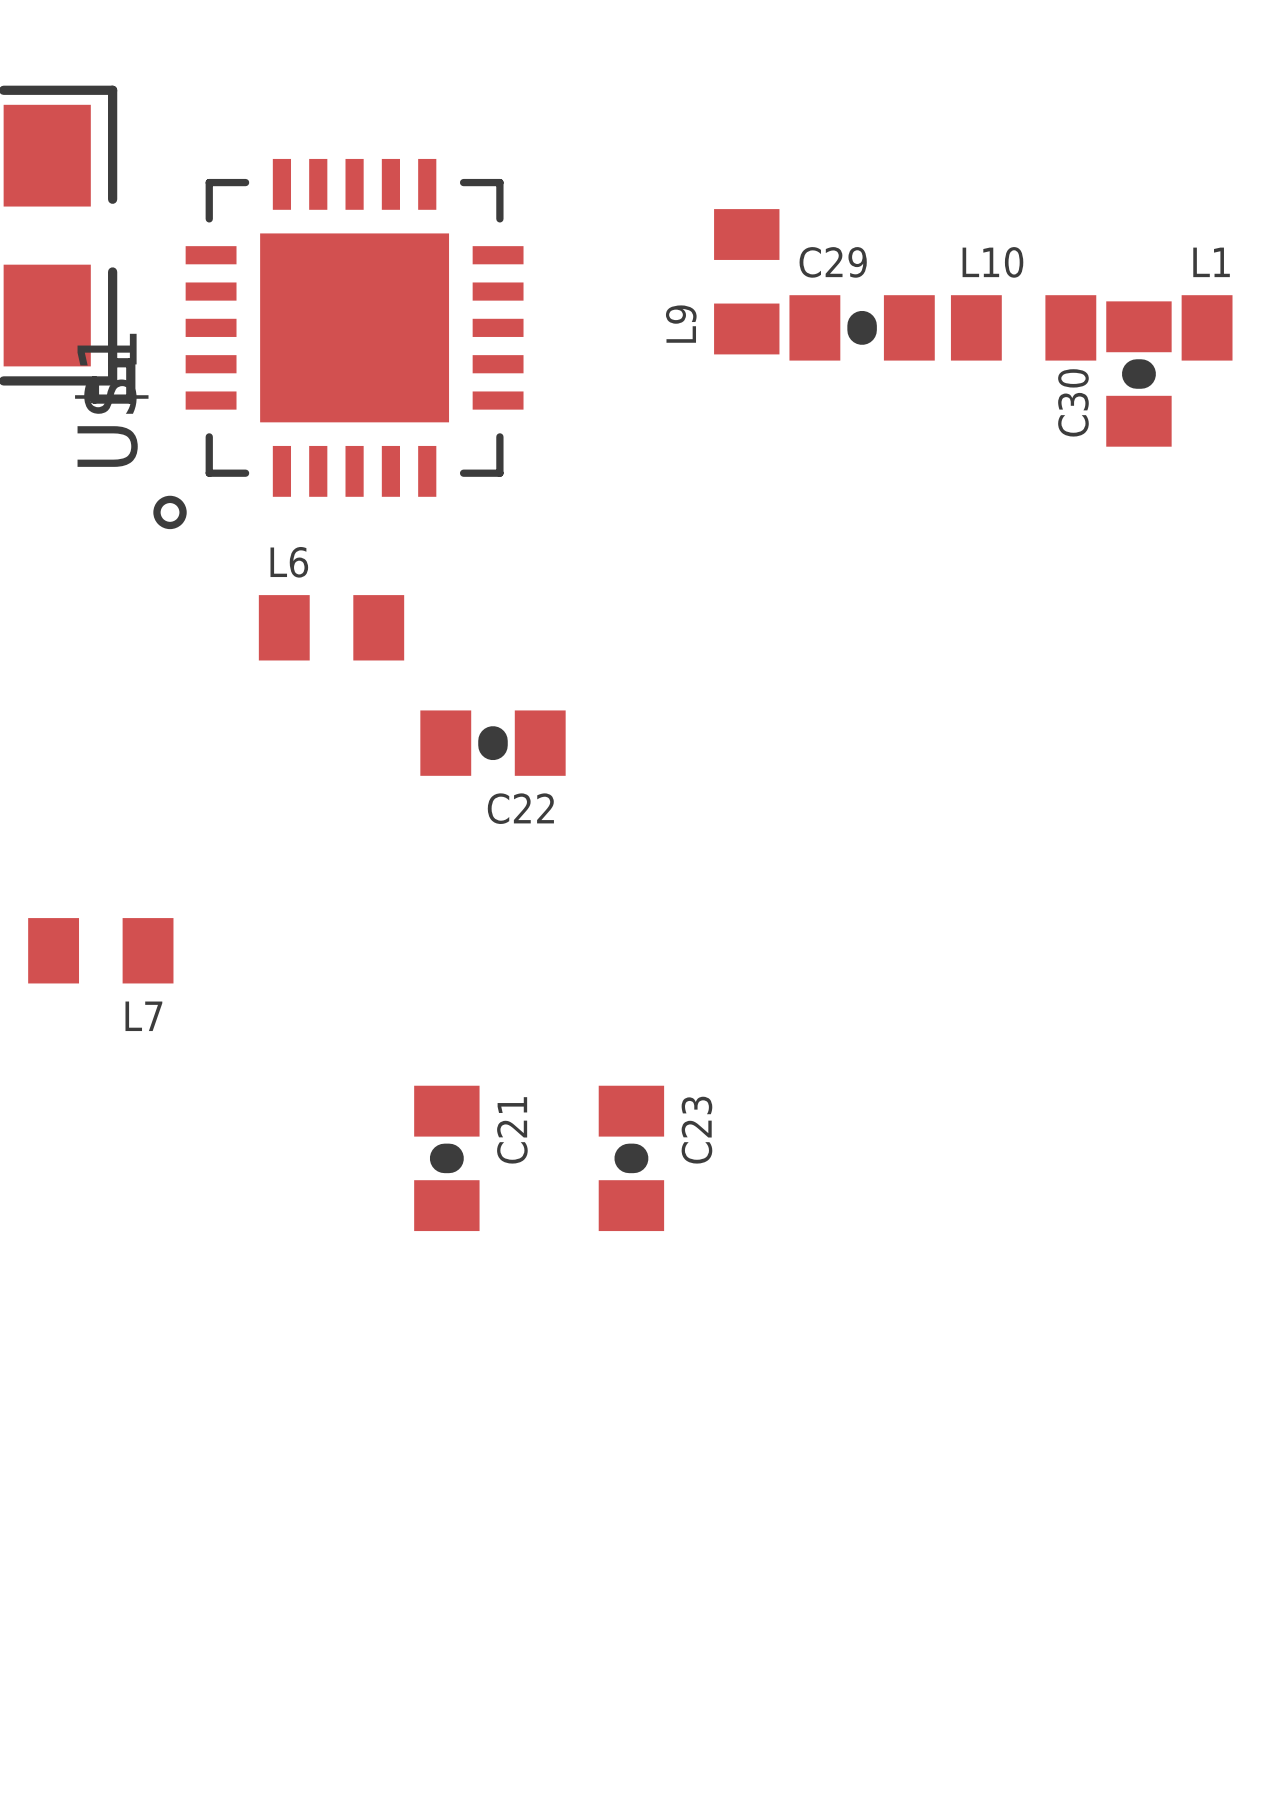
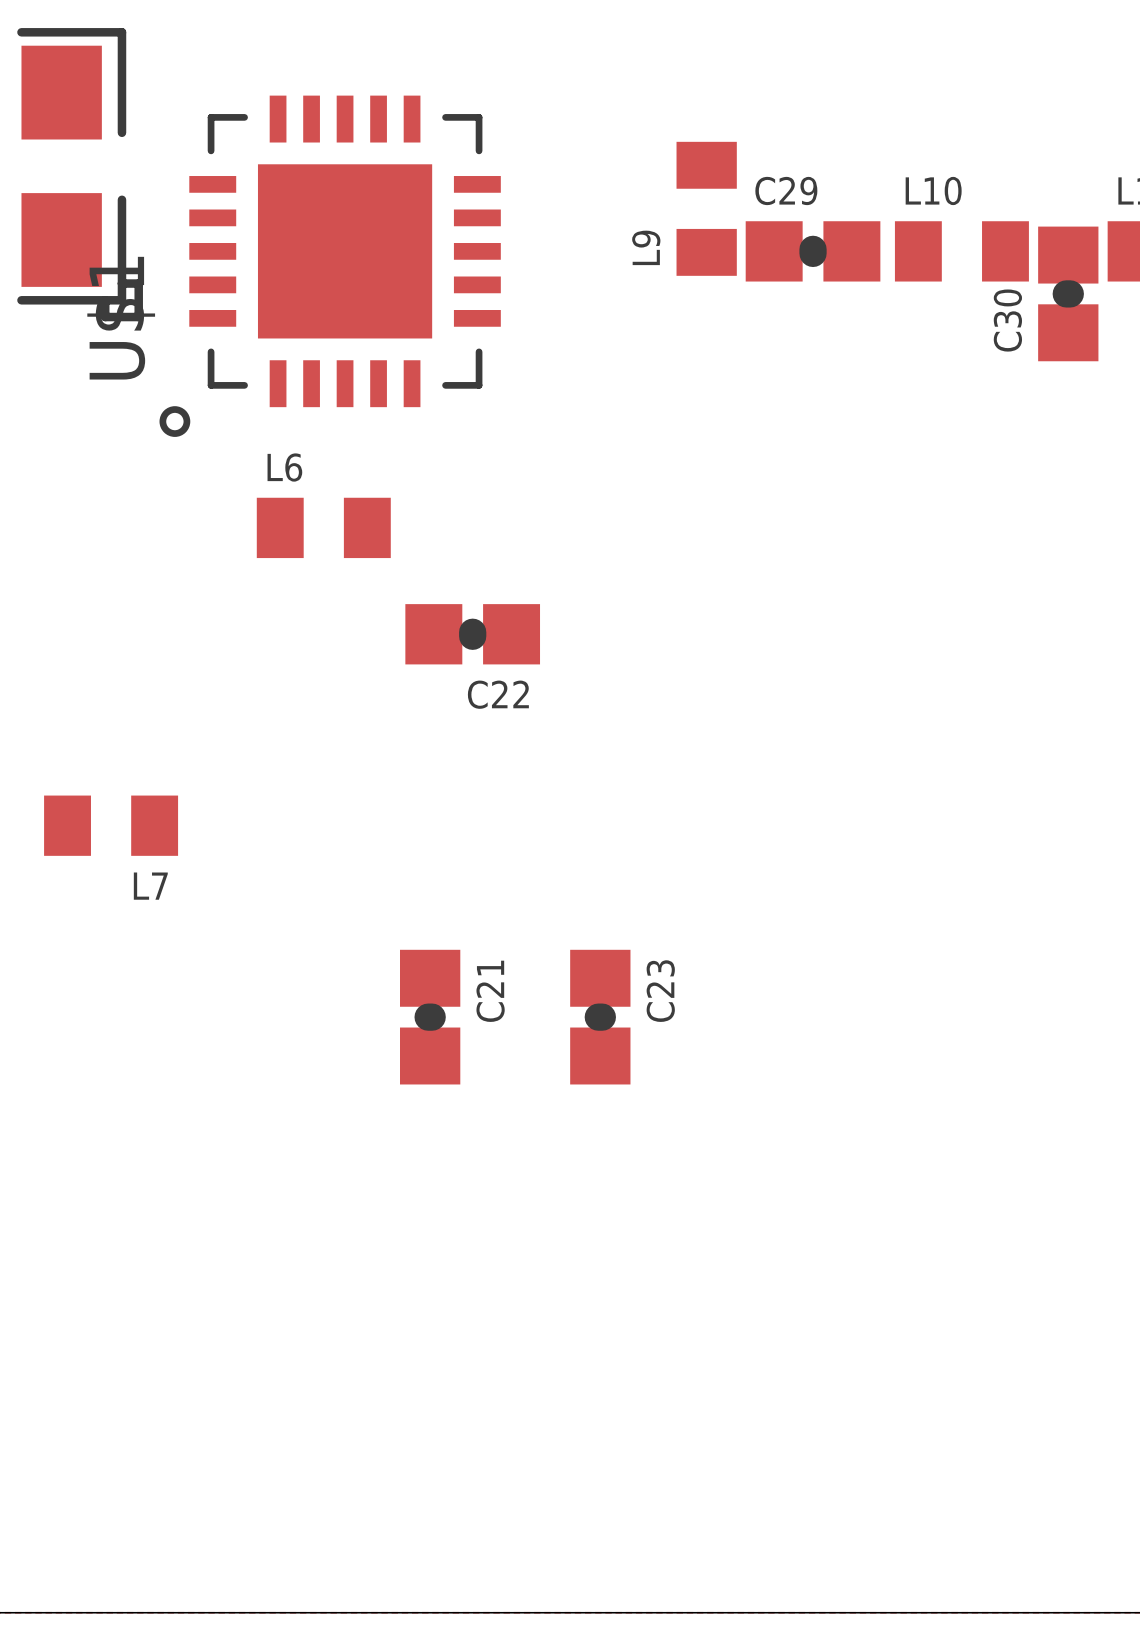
C29 footprint: [789, 295, 935, 361] -> [745, 221, 881, 282]
C30 footprint: [1106, 301, 1172, 447] -> [1038, 226, 1099, 362]
C22 footprint: [420, 710, 566, 776] -> [405, 604, 541, 665]
C21 footprint: [414, 1085, 480, 1232] -> [400, 949, 461, 1085]
C23 footprint: [598, 1085, 665, 1232] -> [570, 949, 631, 1085]

